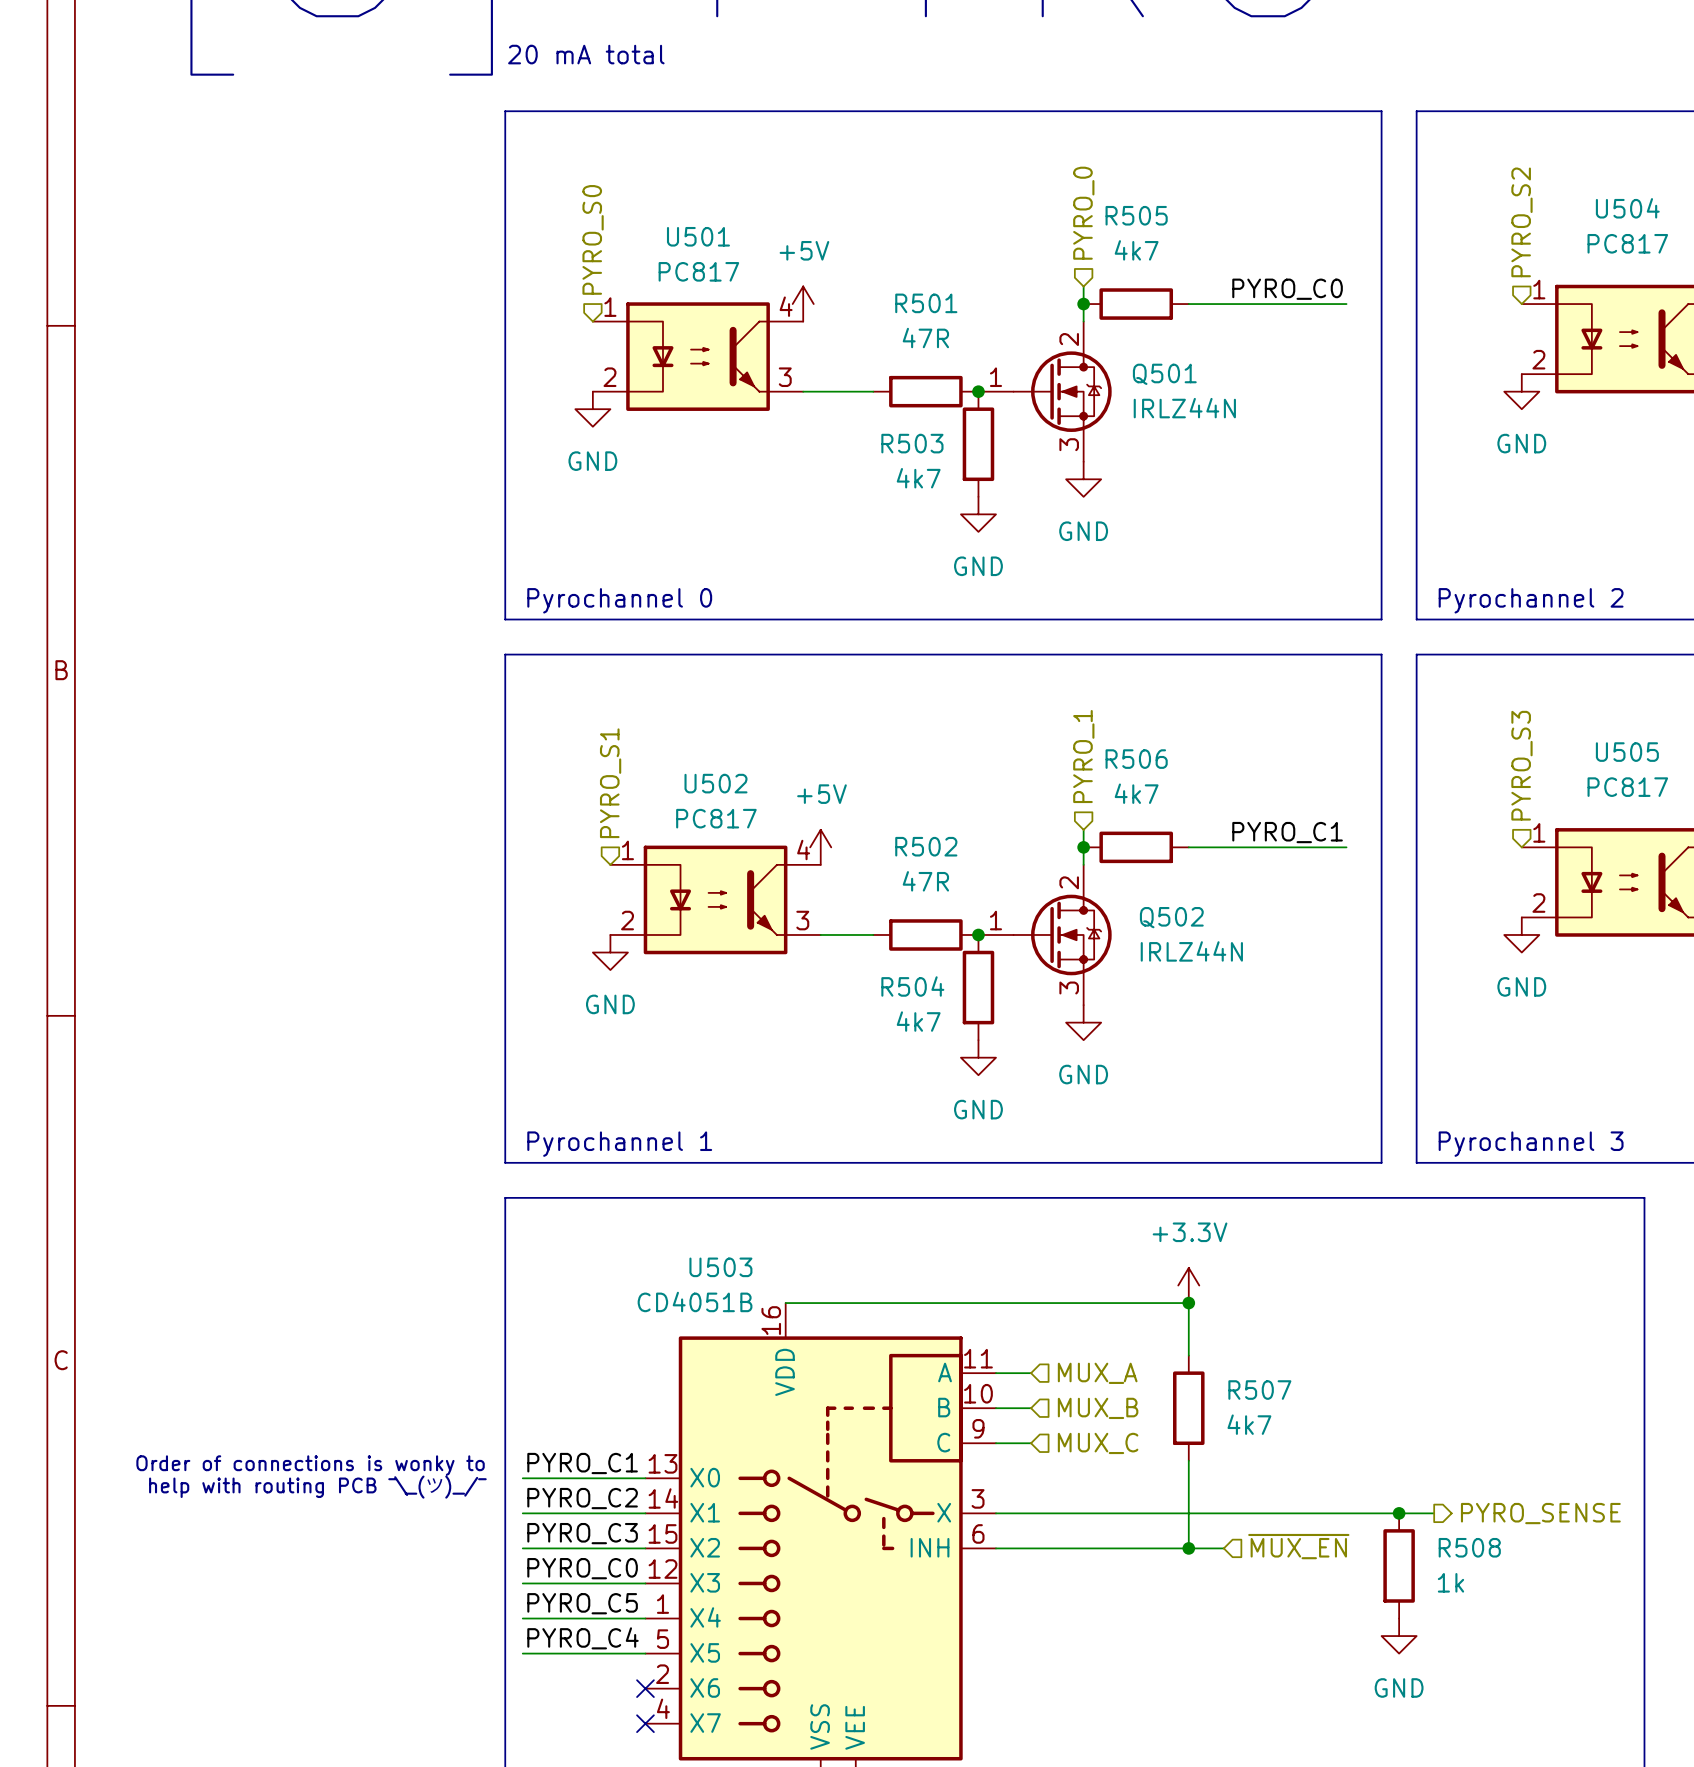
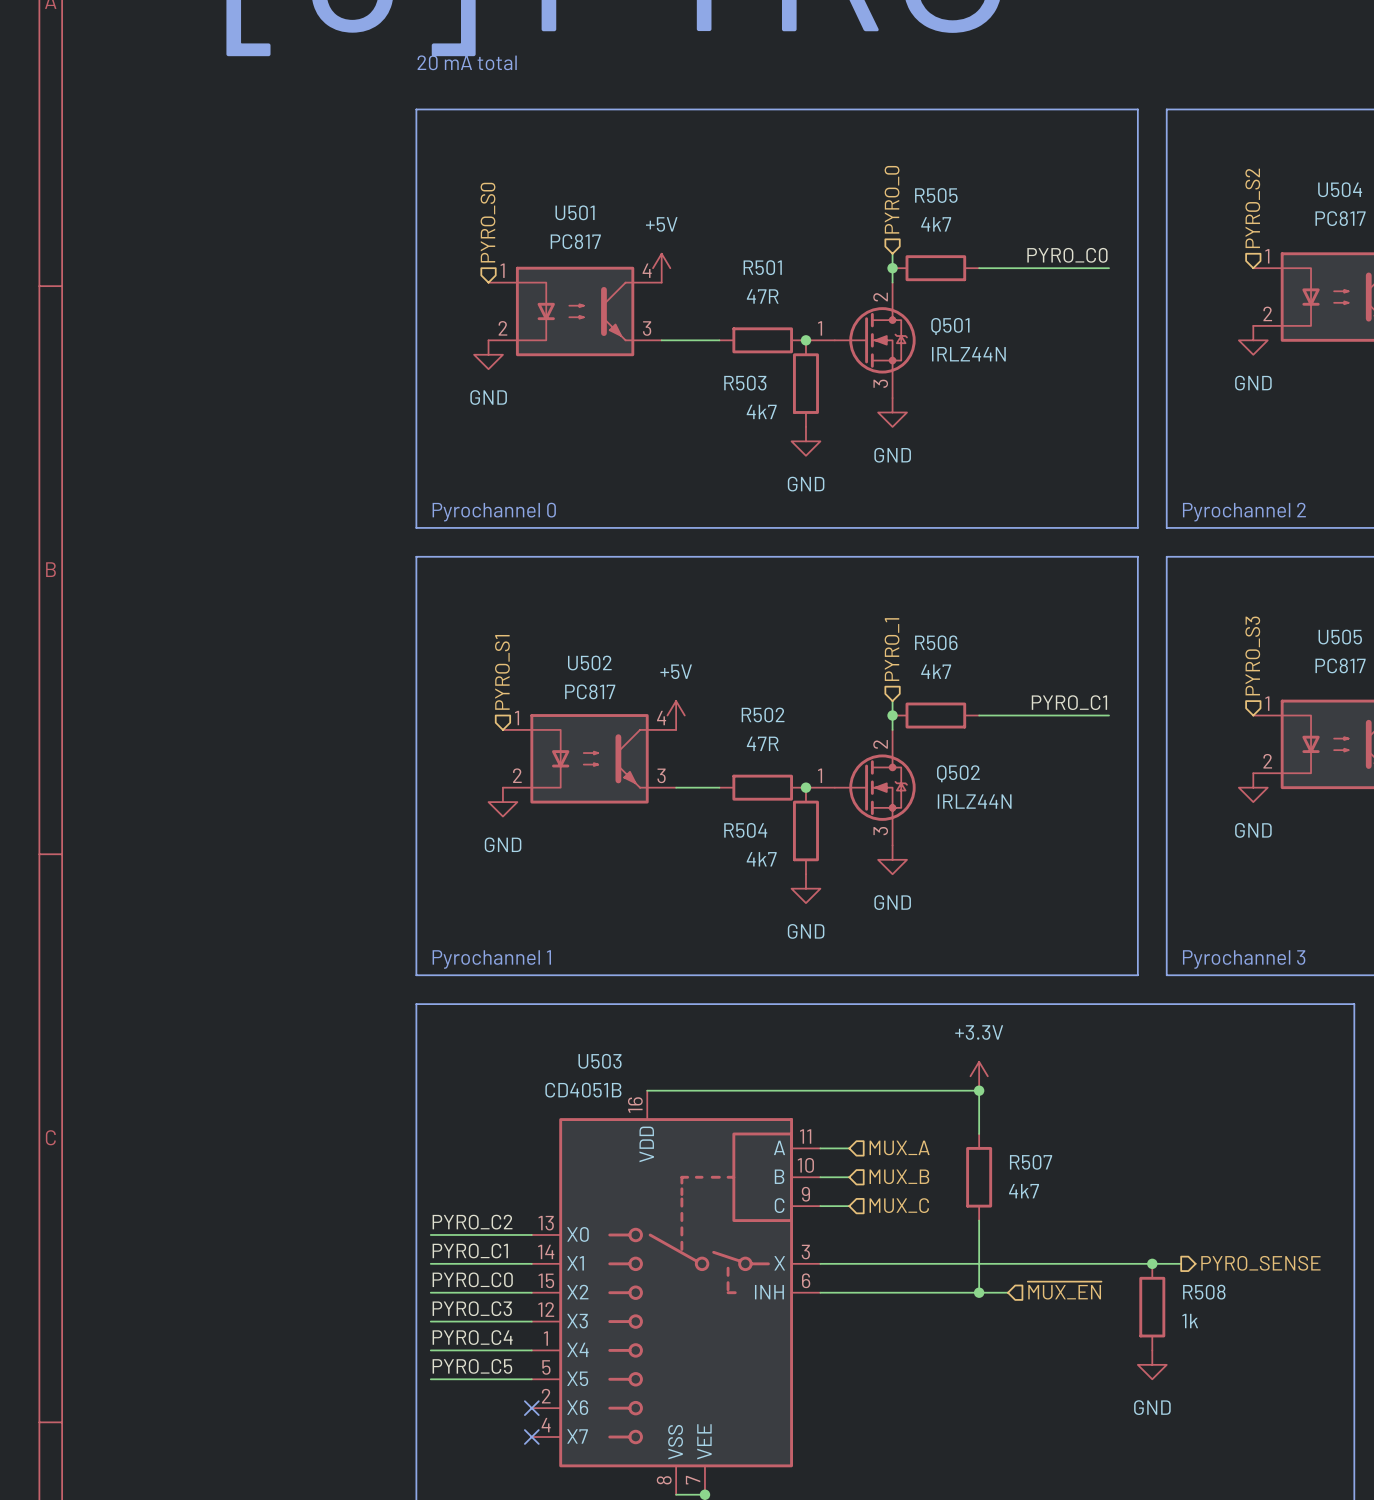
label: PYRO_C1 (582, 1463) -> PYRO_C2 (472, 1222)
text: Order of connections is wonky to (310, 1465) -> none
text: help with routing PCB ¯\_(ツ)_/¯ (317, 1487) -> none
label: PYRO_C2 (582, 1498) -> PYRO_C1 (470, 1250)
label: PYRO_C3 (582, 1533) -> PYRO_C0 (472, 1279)
label: PYRO_C0 (582, 1568) -> PYRO_C3 (472, 1308)
label: PYRO_C5 (582, 1603) -> PYRO_C4 (472, 1337)
label: PYRO_C4 (583, 1638) -> PYRO_C5 (472, 1366)

